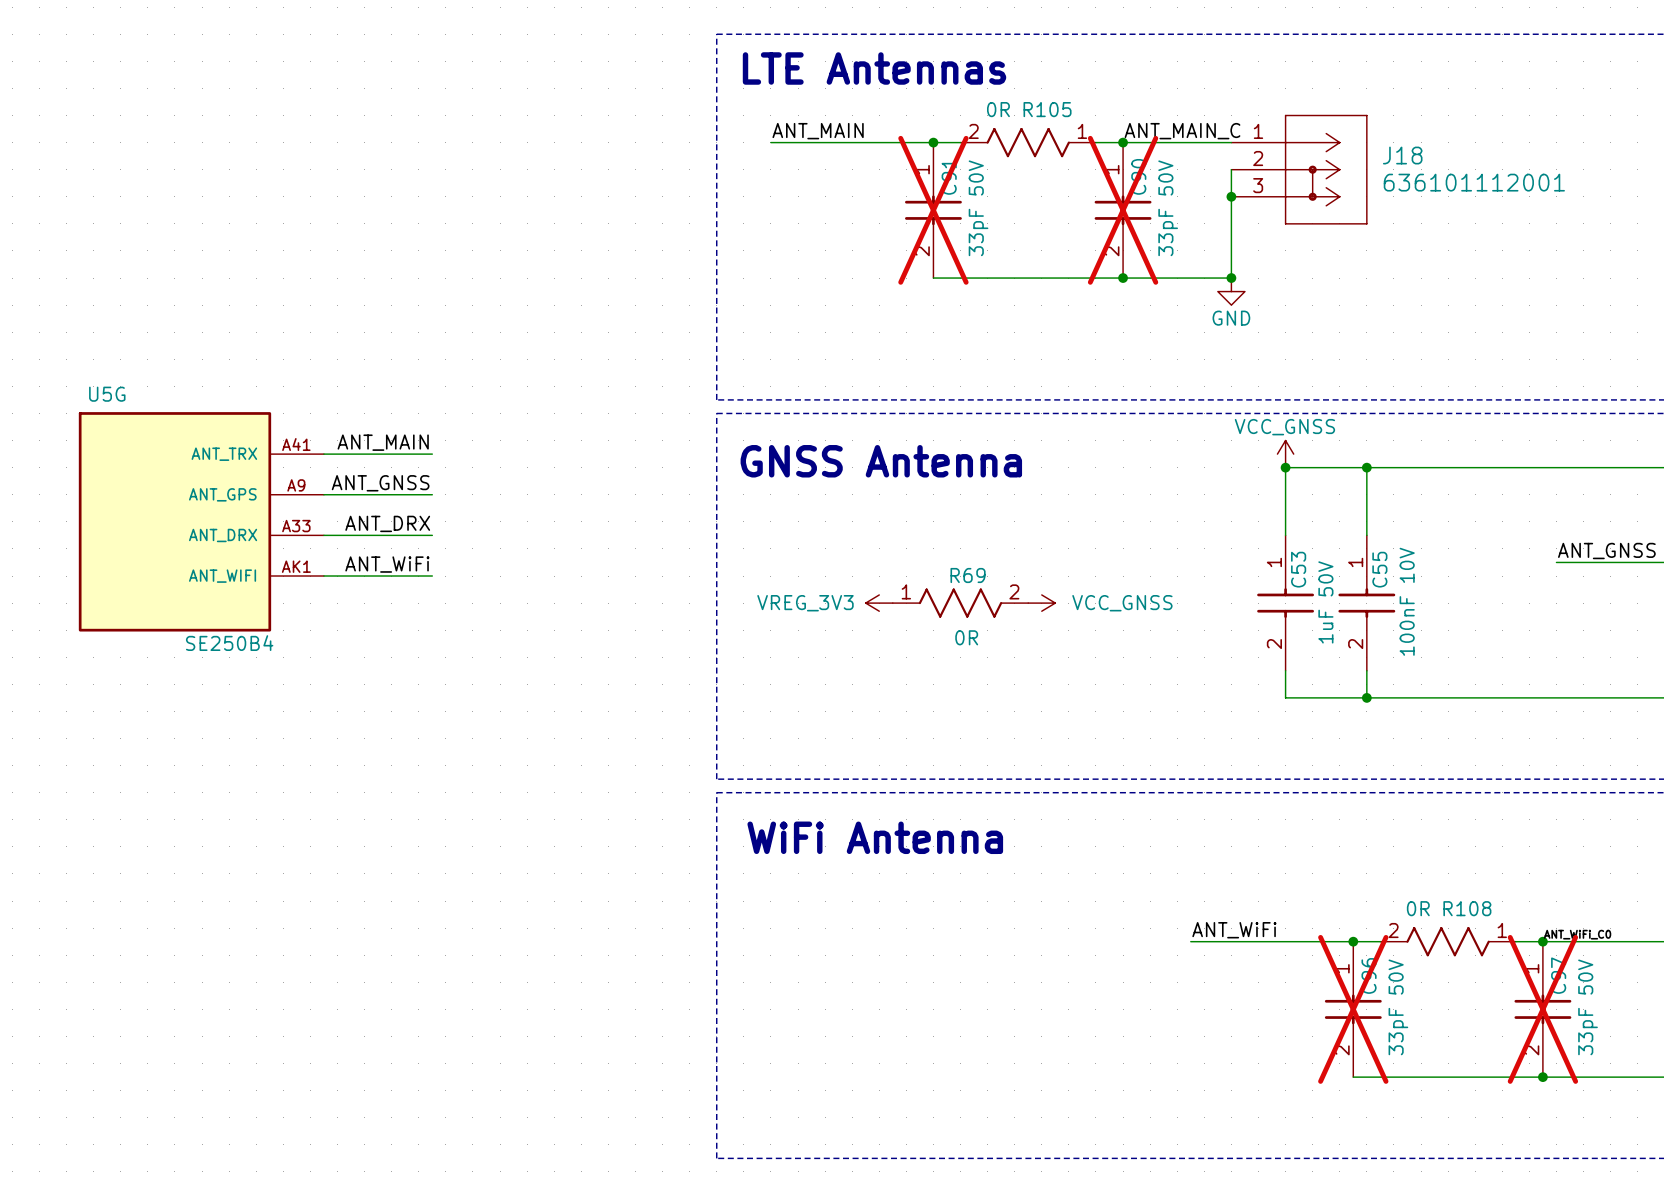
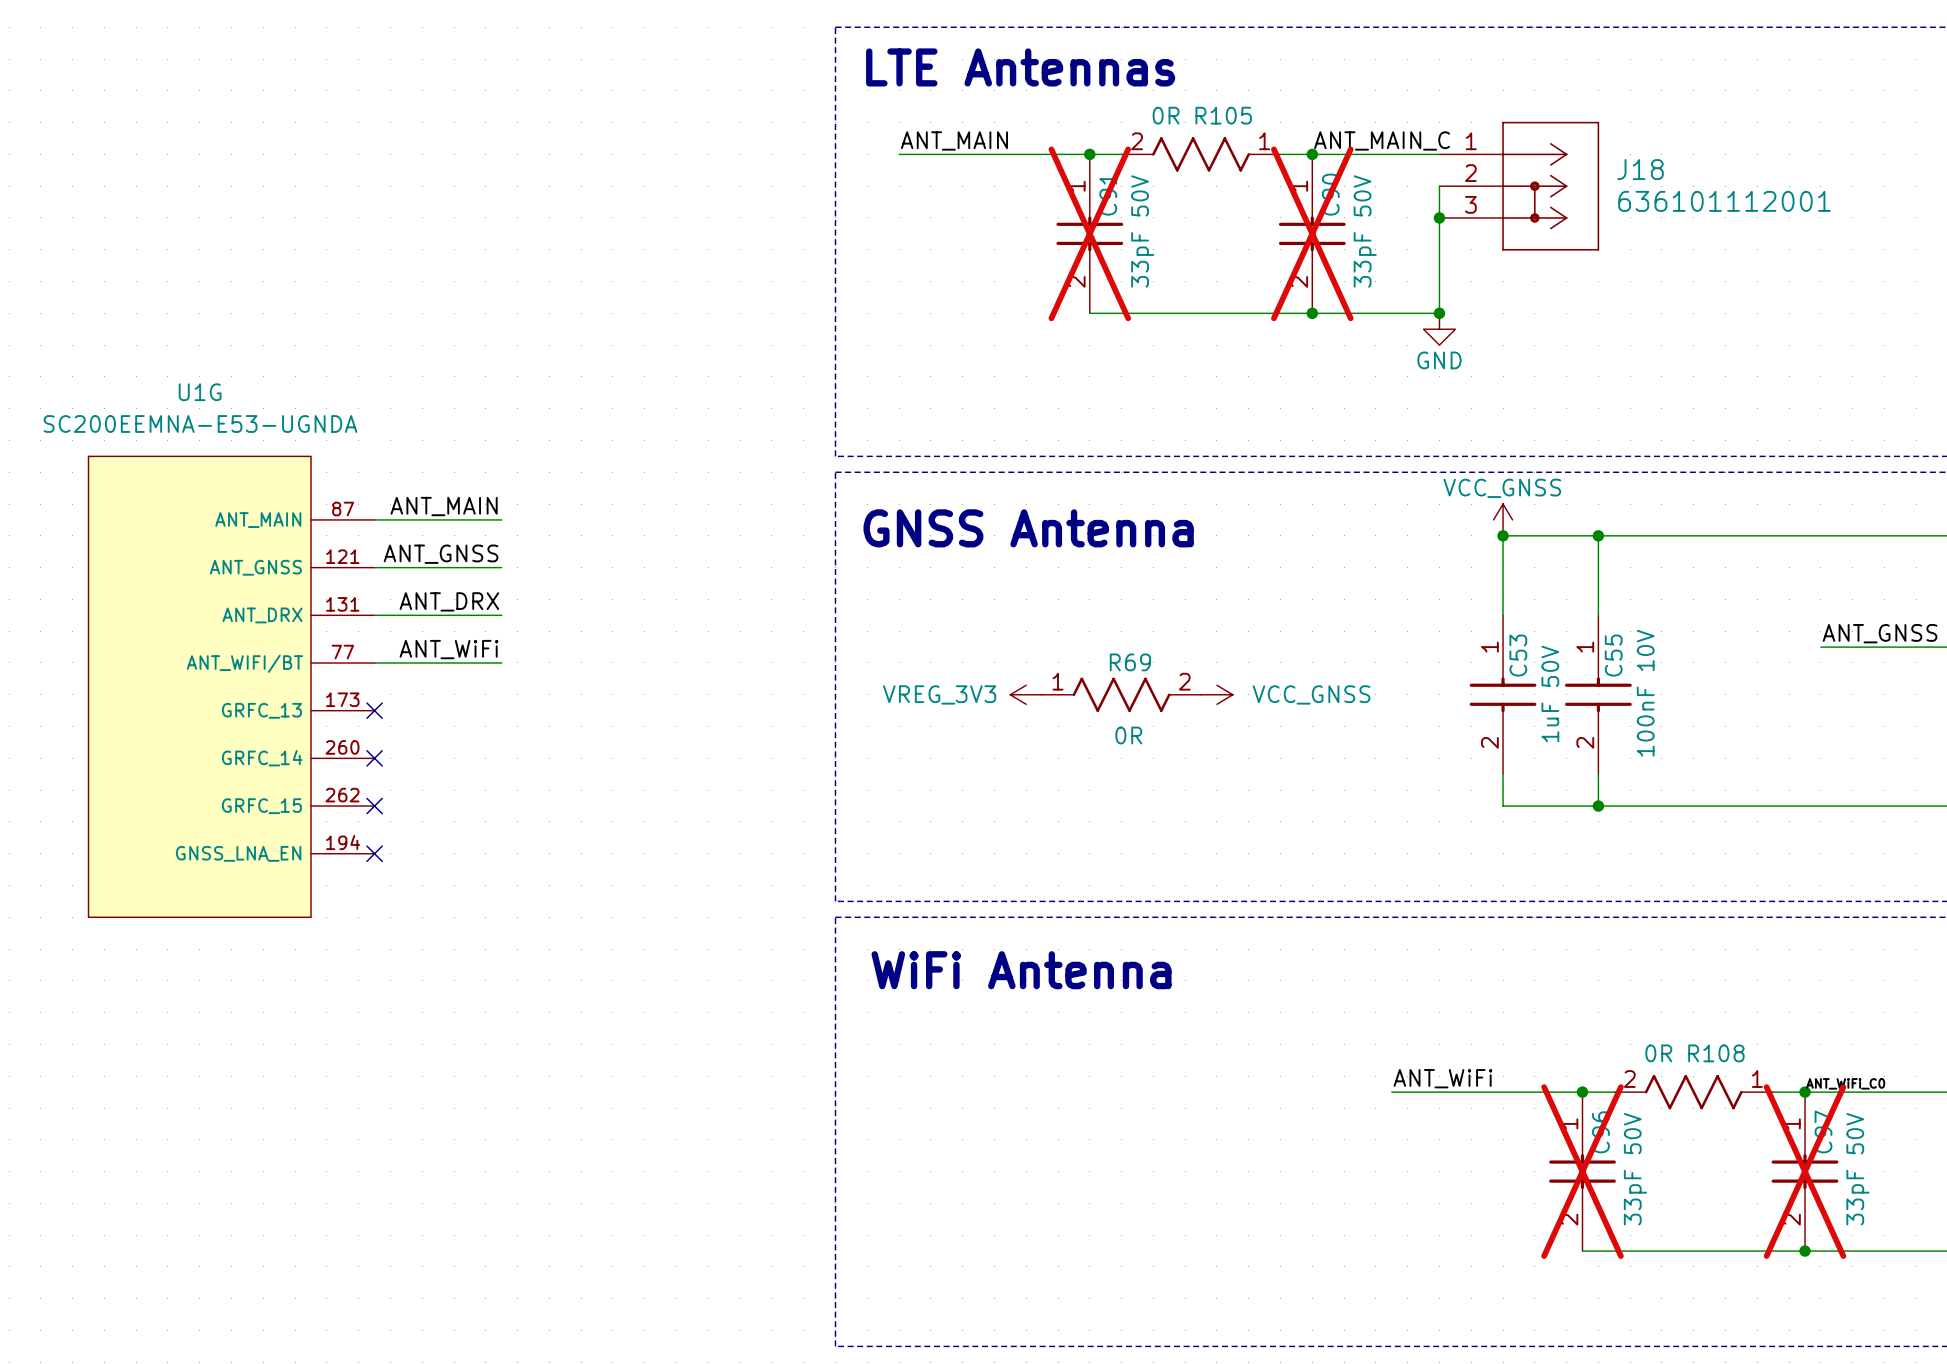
U5G: SE250B4 (201, 521) -> none
U1G: none -> SC200EEMNA-E53-UGNDA (231, 686)
no-connect mark: none -> (374, 710)
no-connect mark: none -> (374, 758)
no-connect mark: none -> (374, 806)
no-connect mark: none -> (374, 853)

